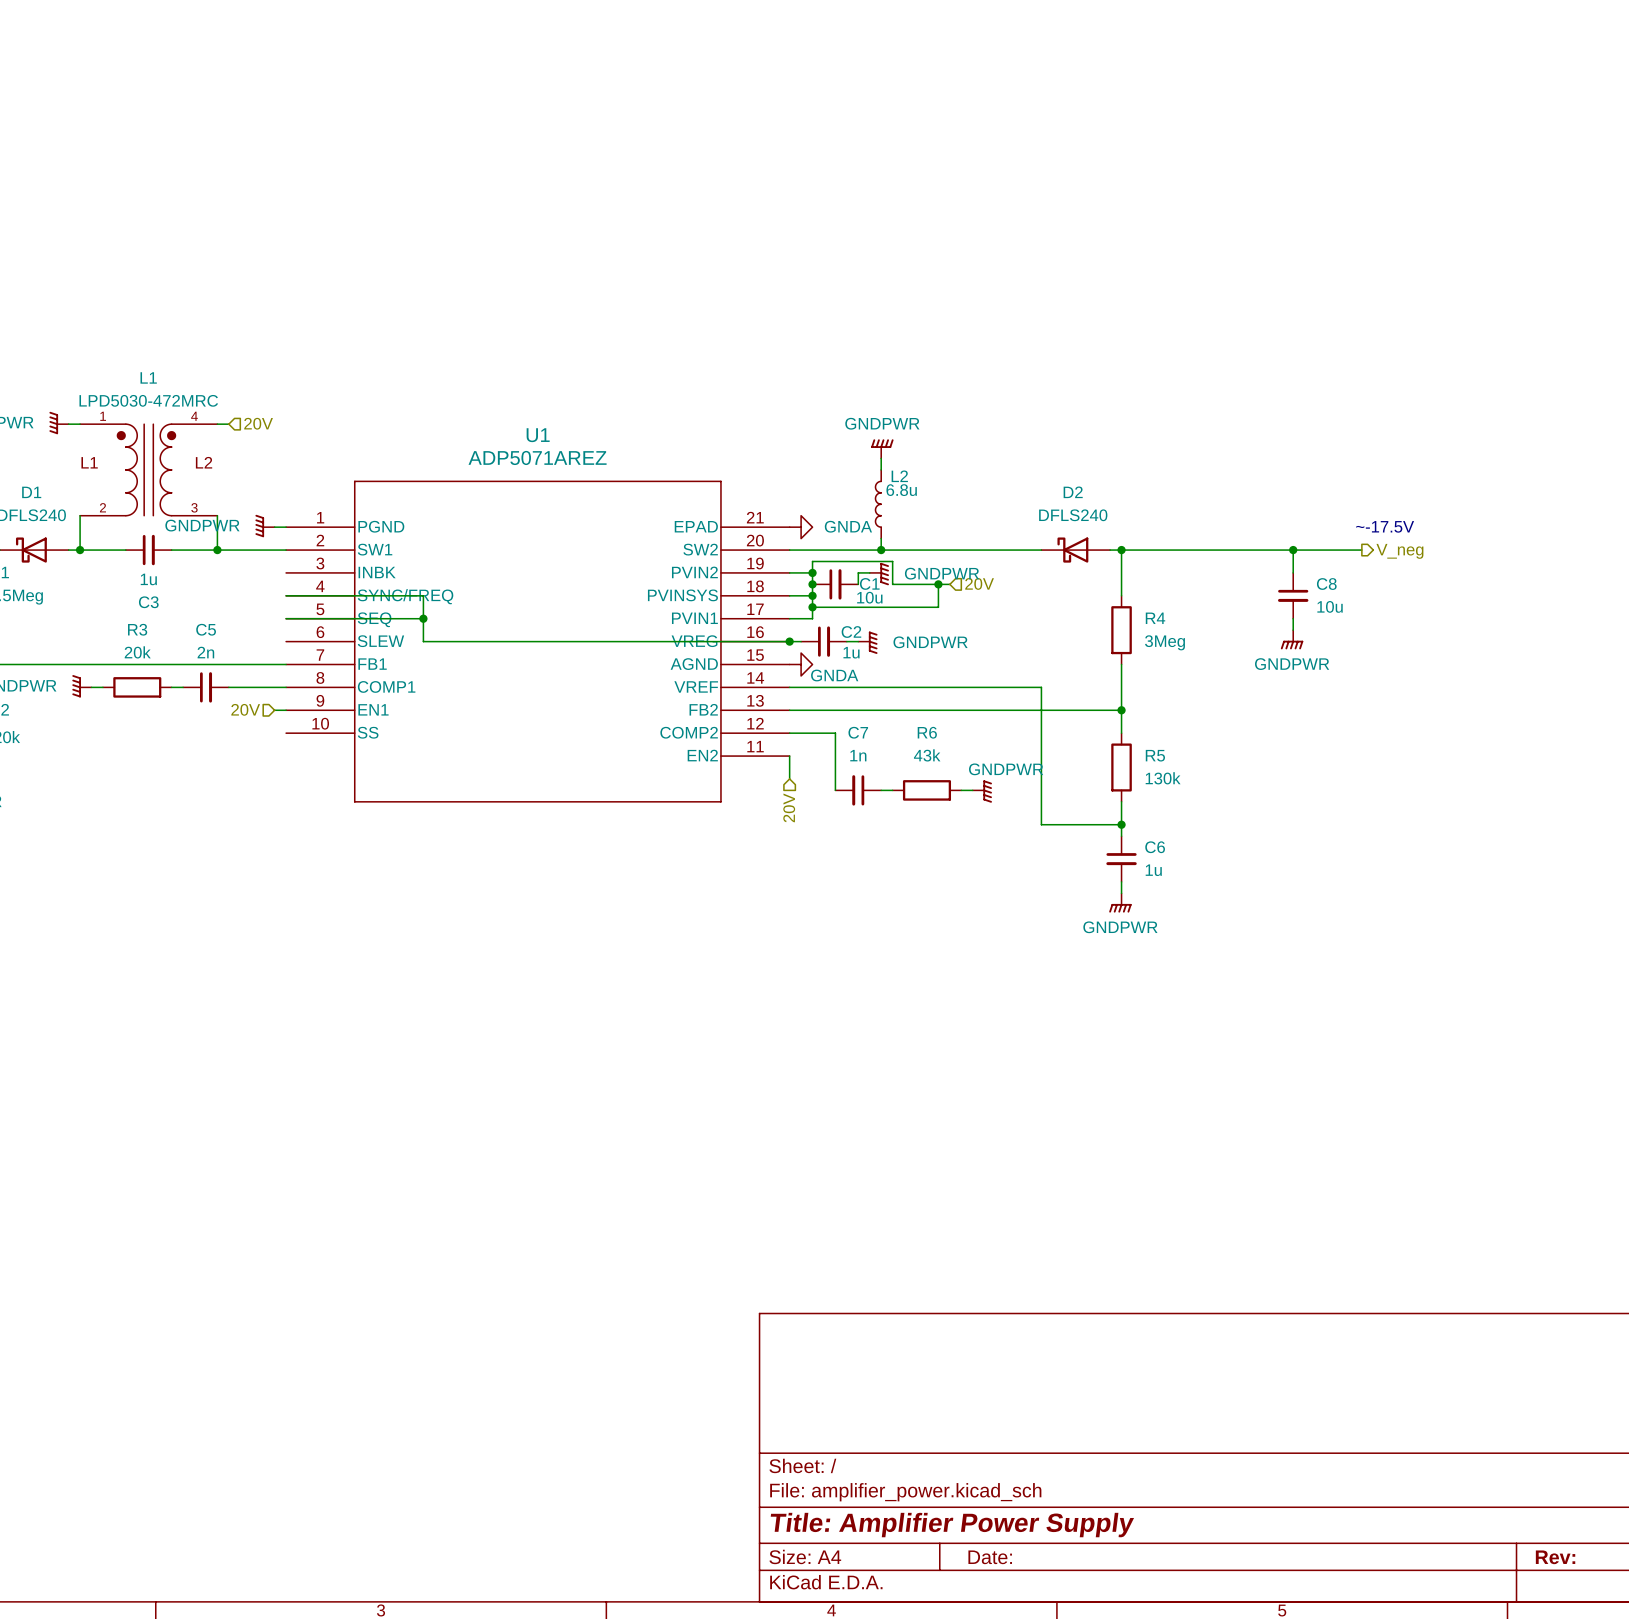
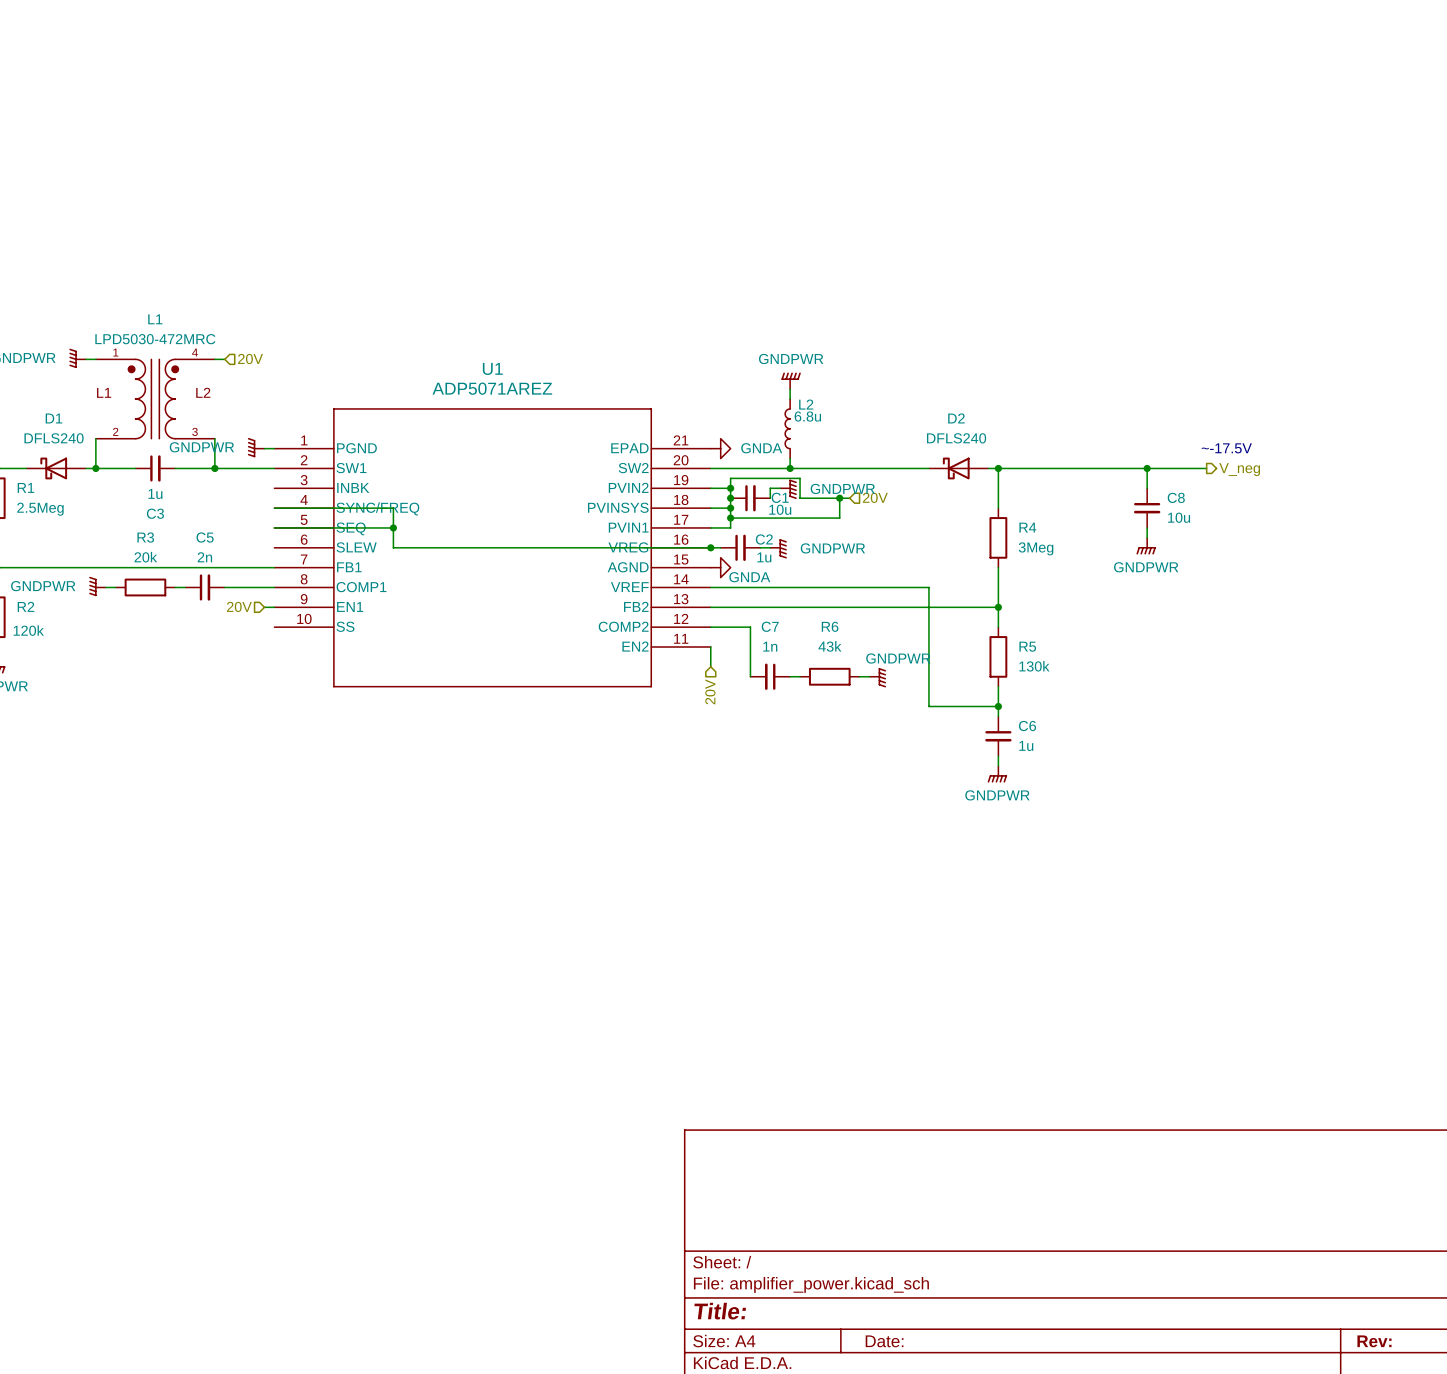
title block: Title: Amplifier Power Supply (952, 1525) -> Title: (720, 1311)

